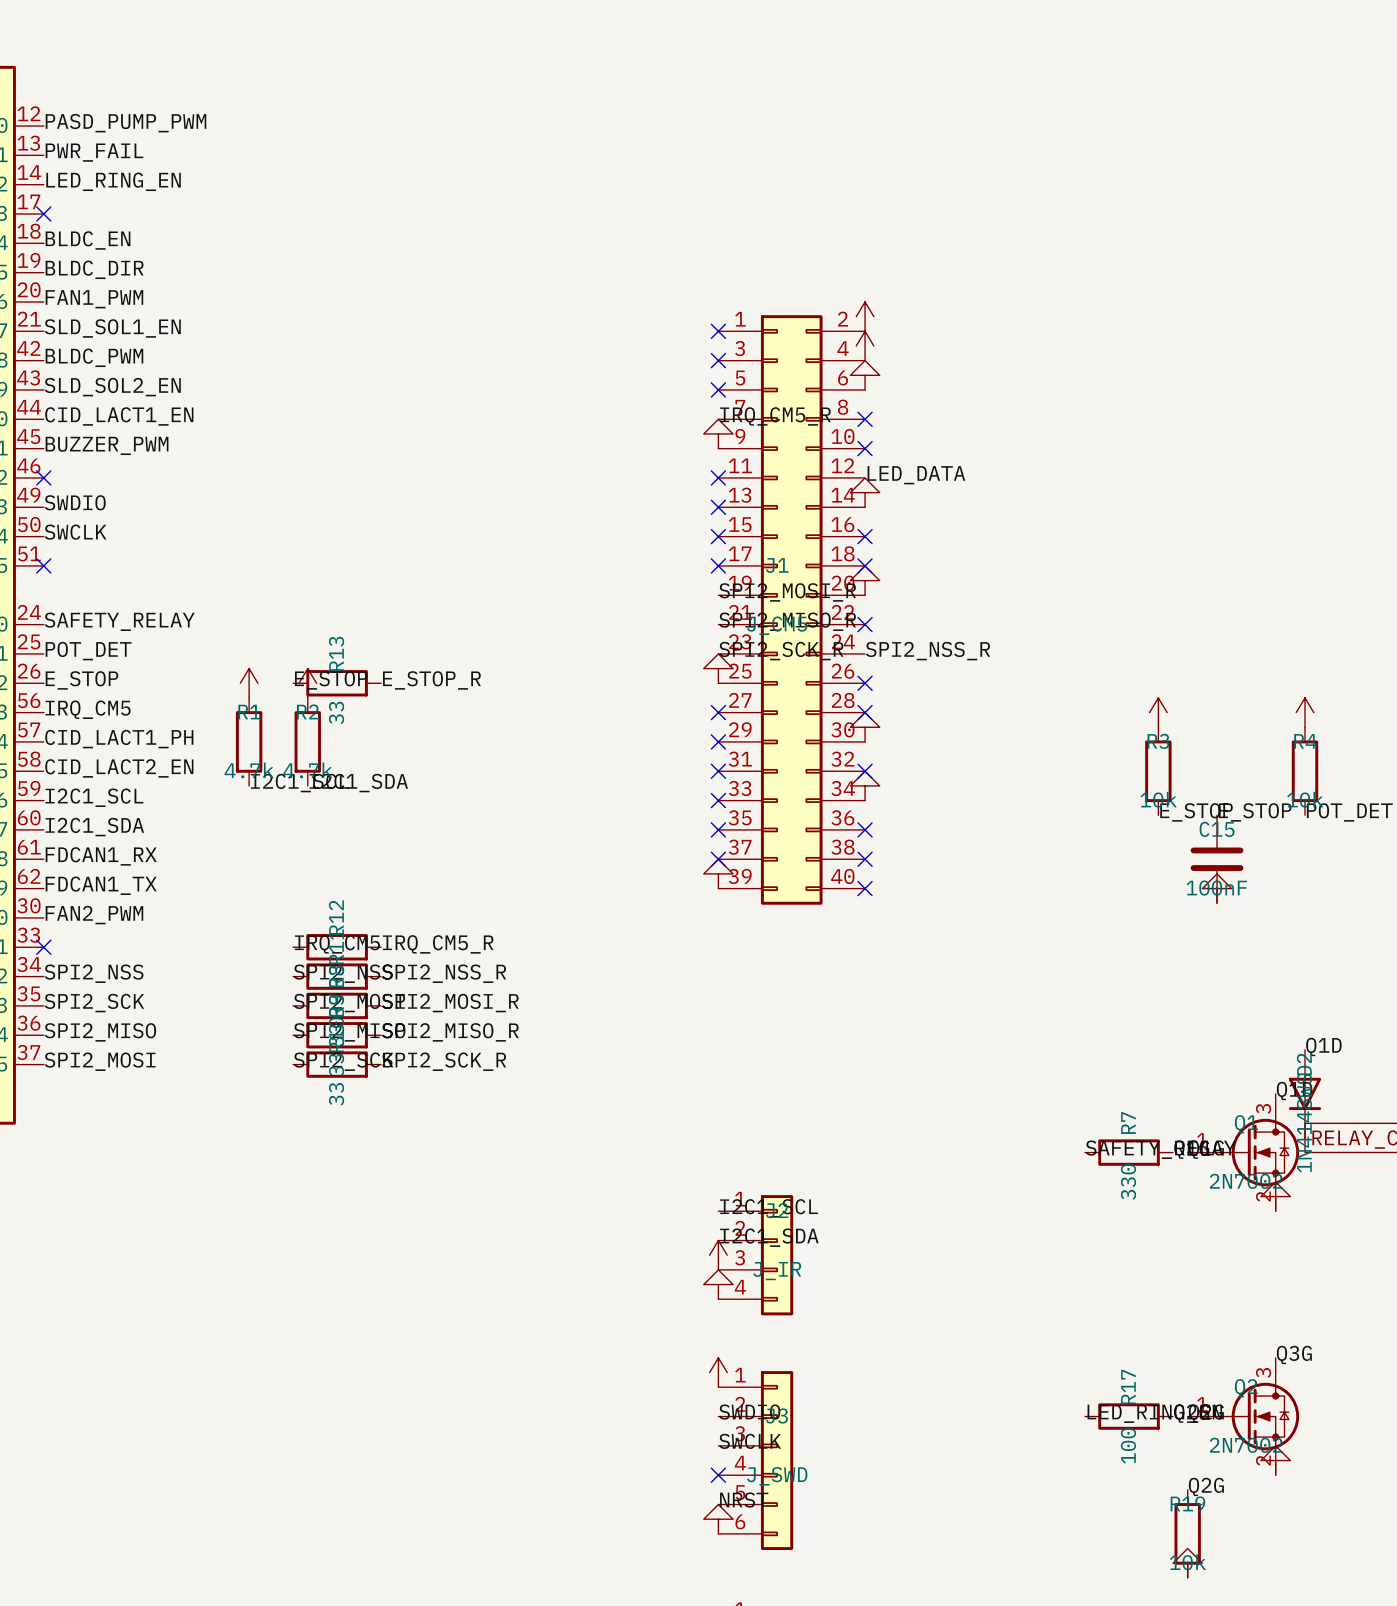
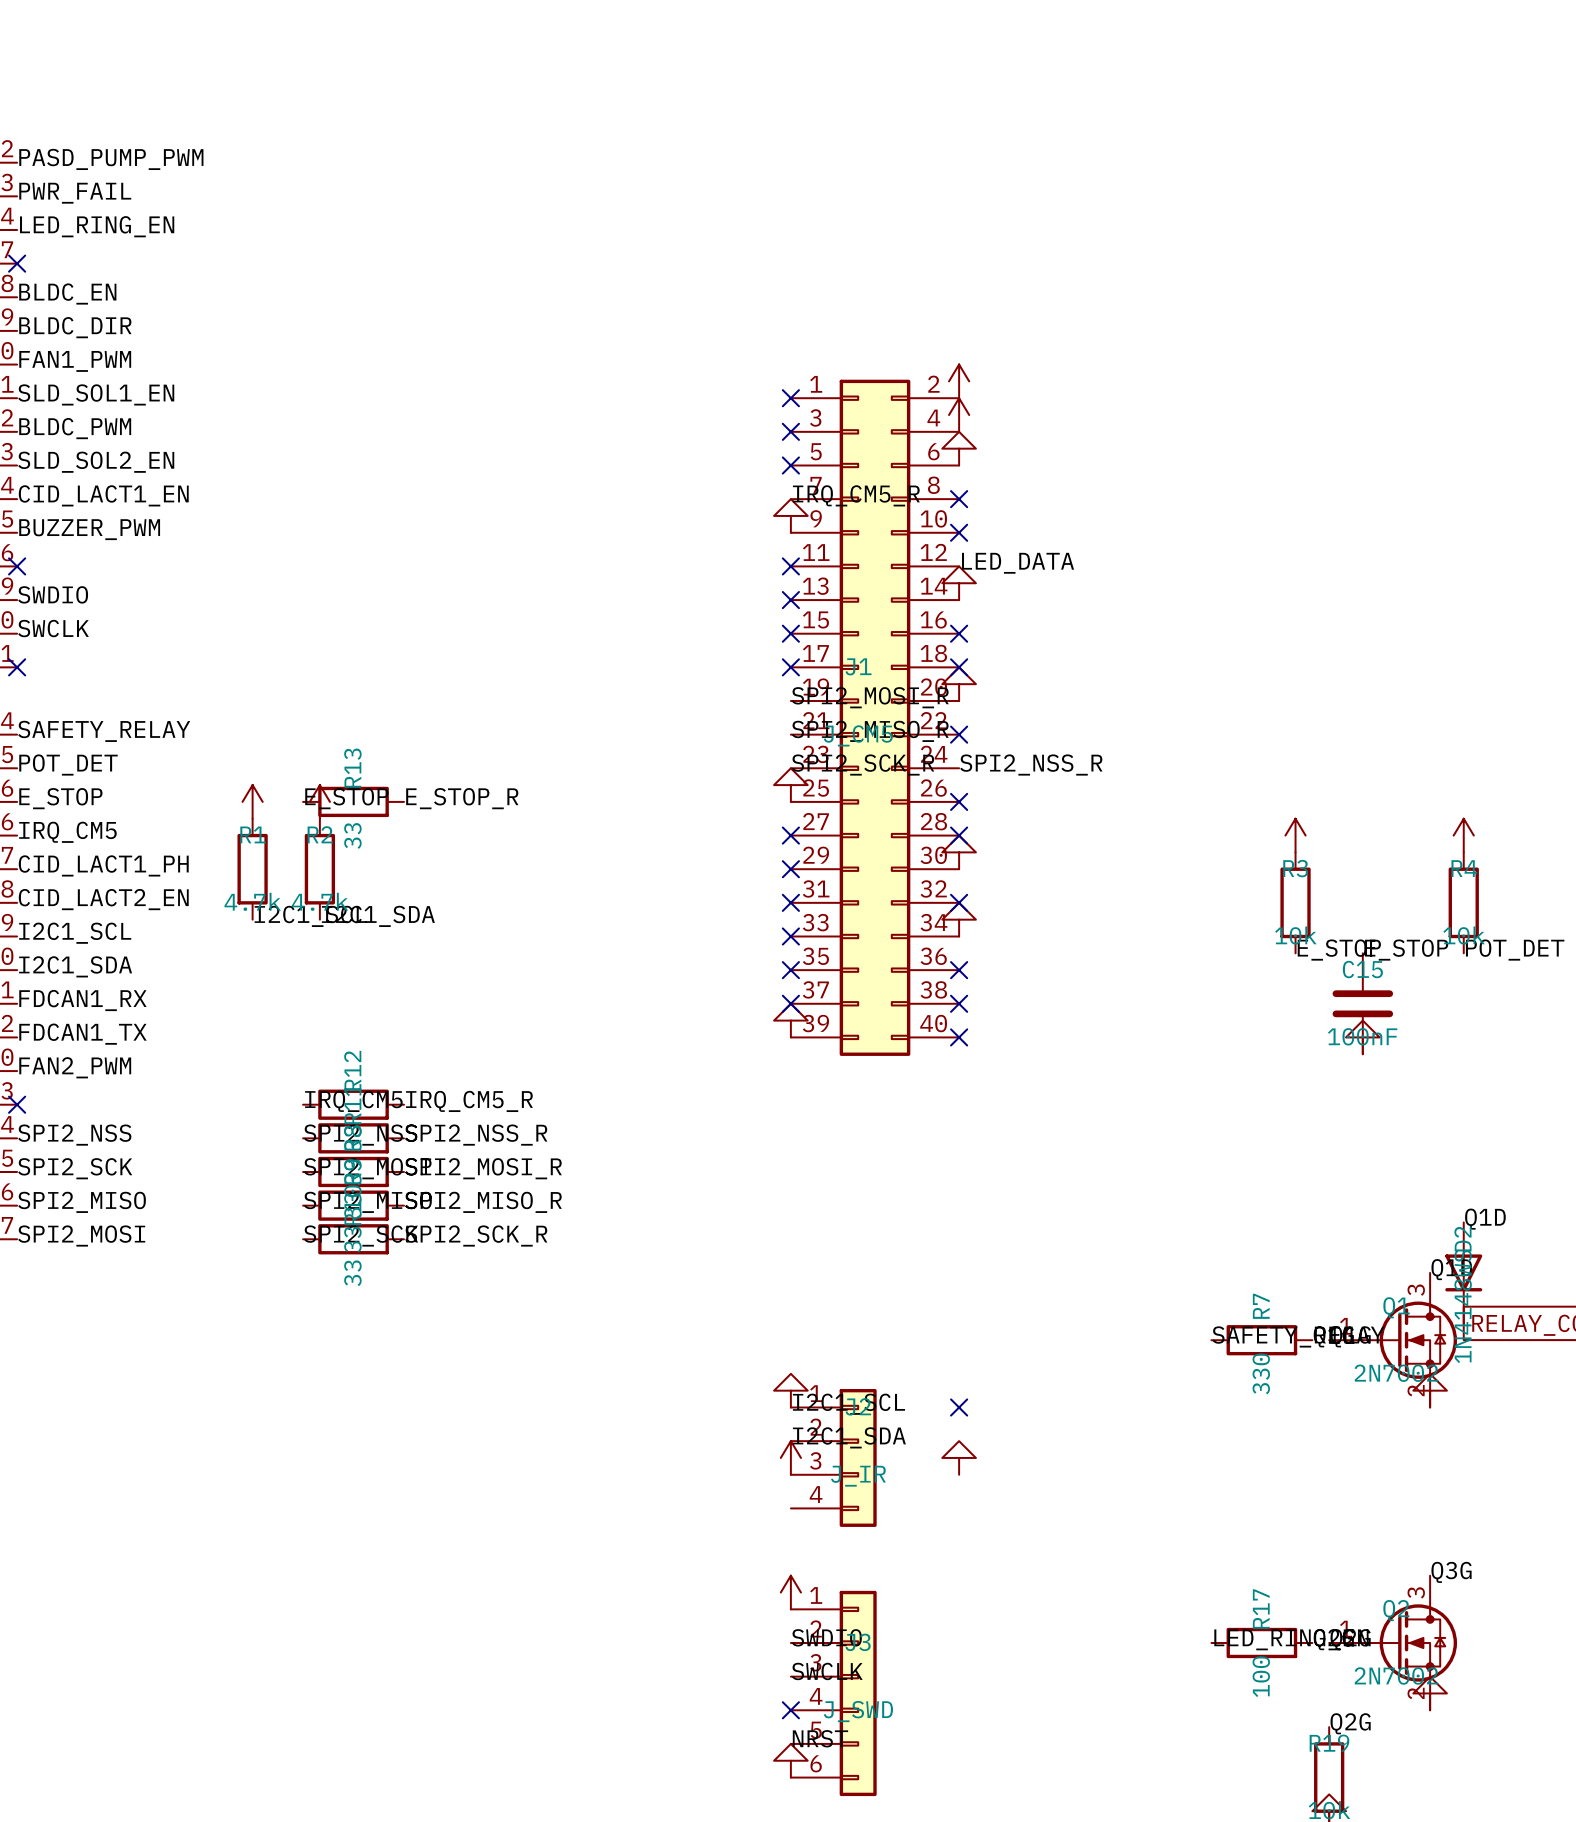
power symbol: none -> (790, 1390)
no-connect mark: none -> (959, 1407)
power symbol: none -> (959, 1457)
power symbol: (718, 1284) -> none

